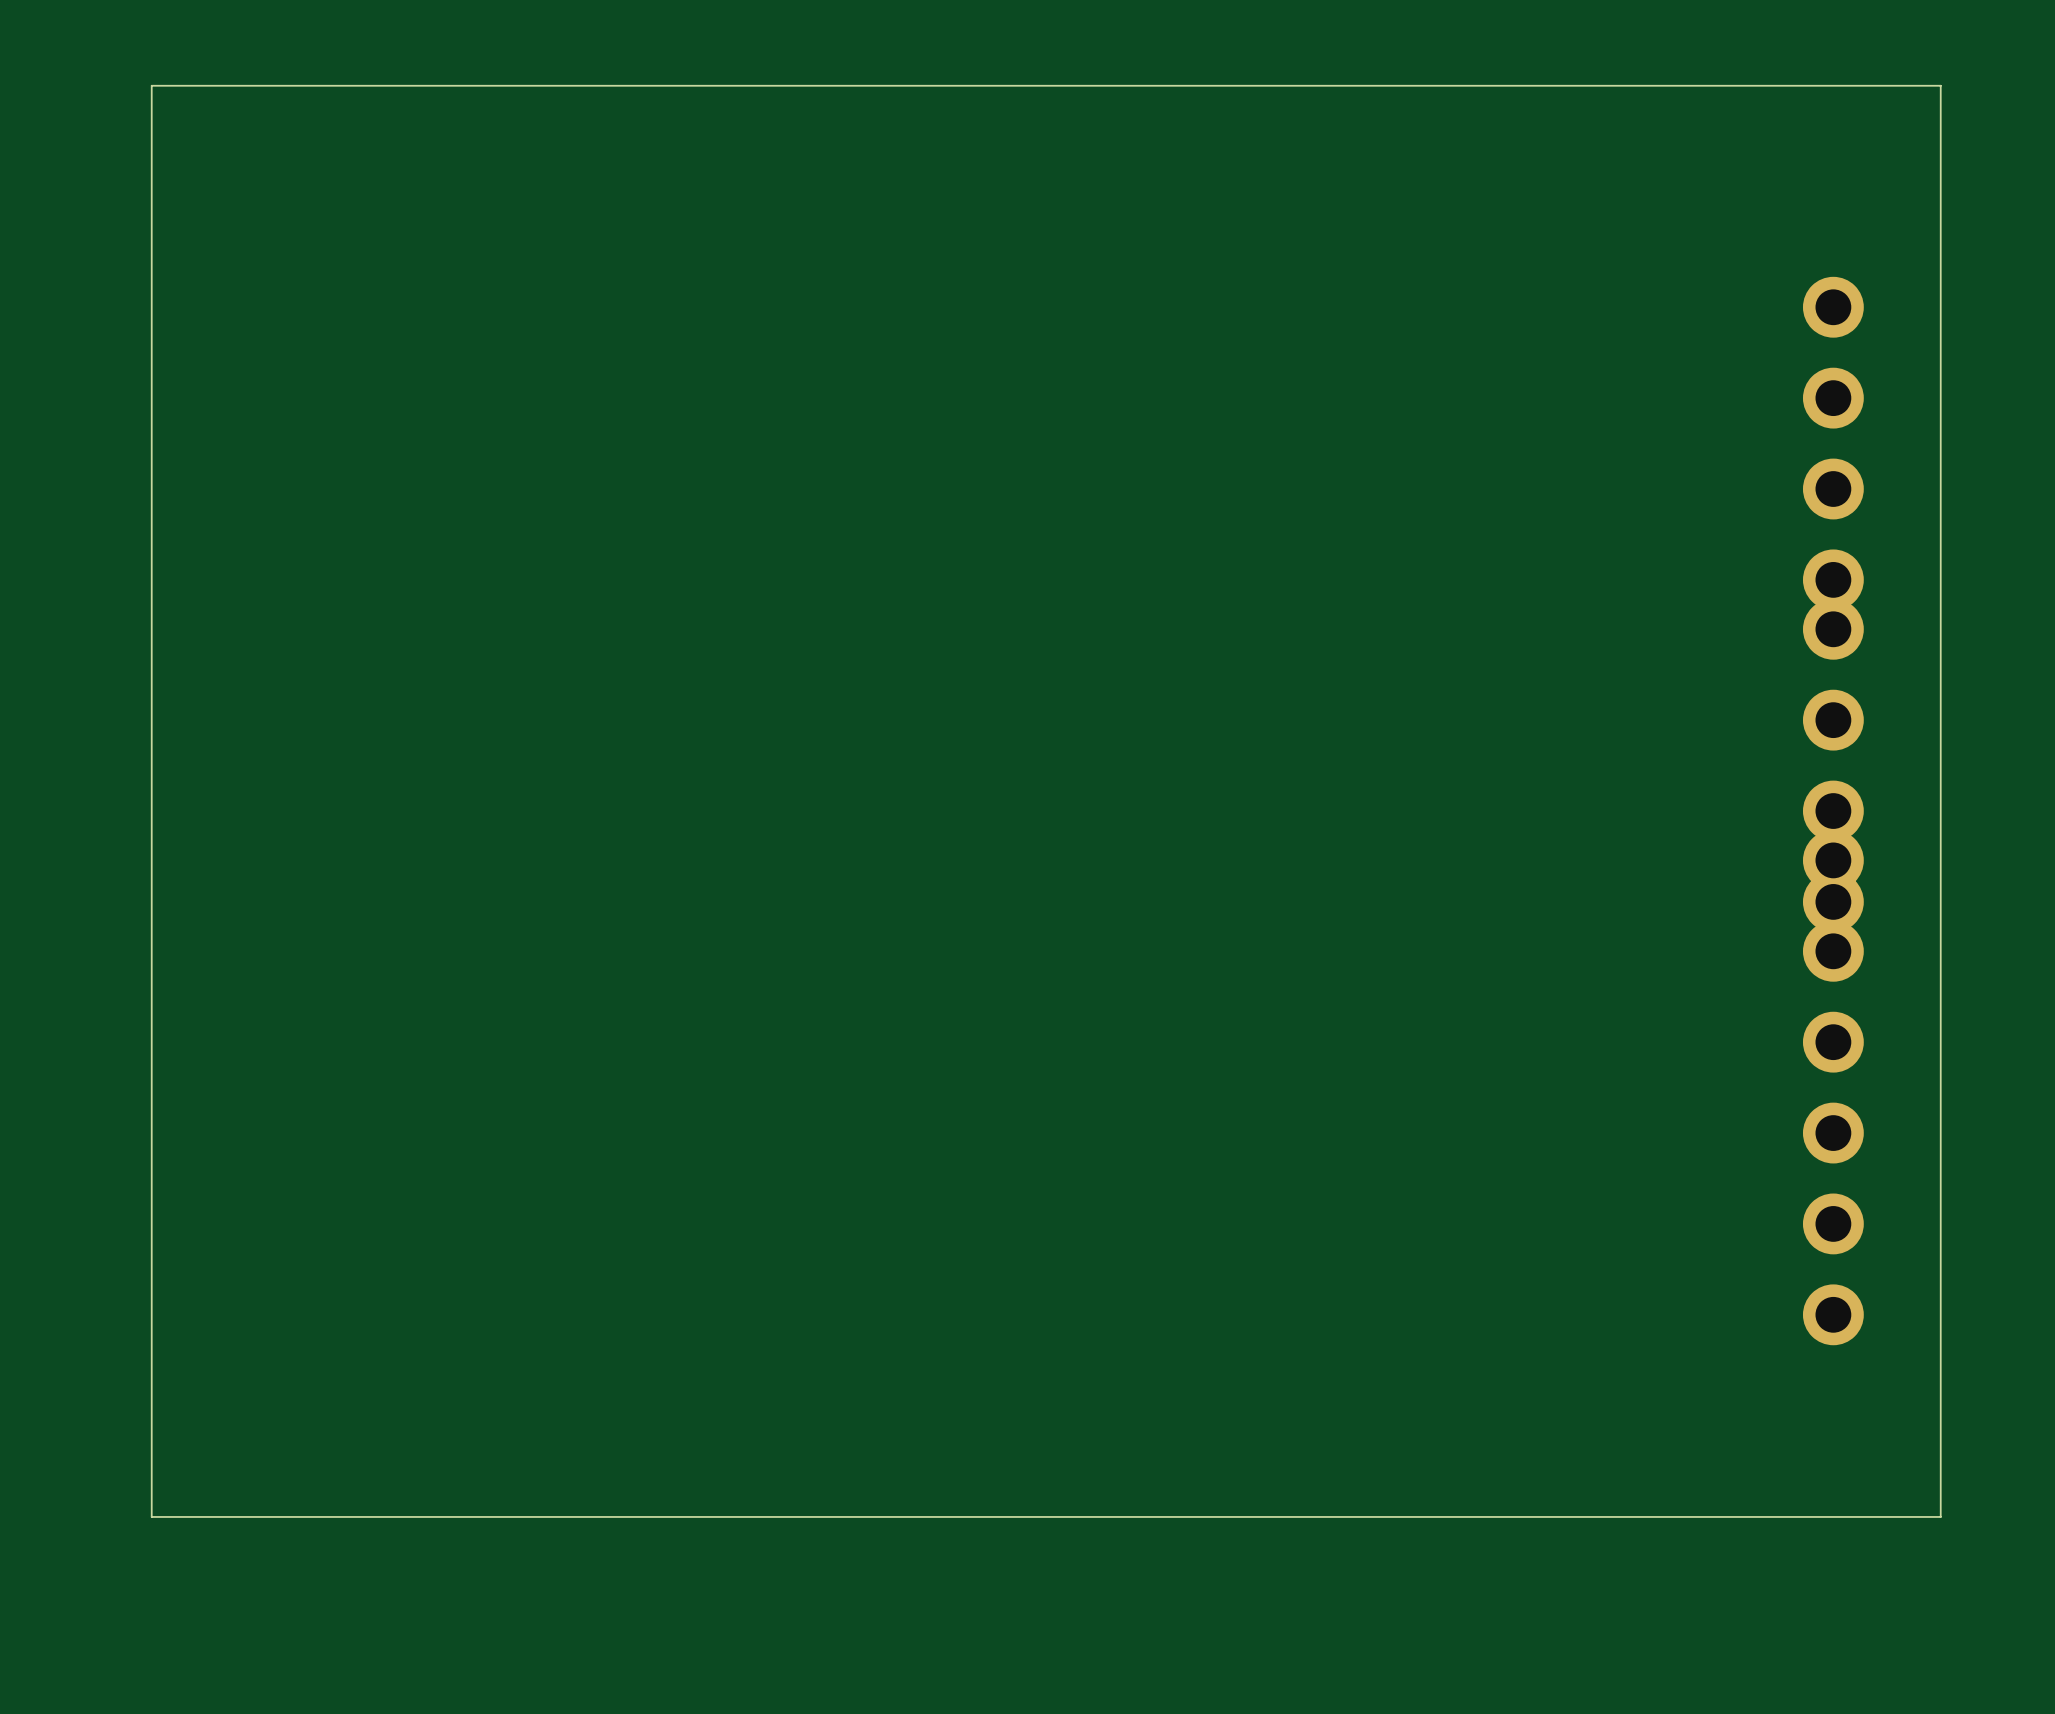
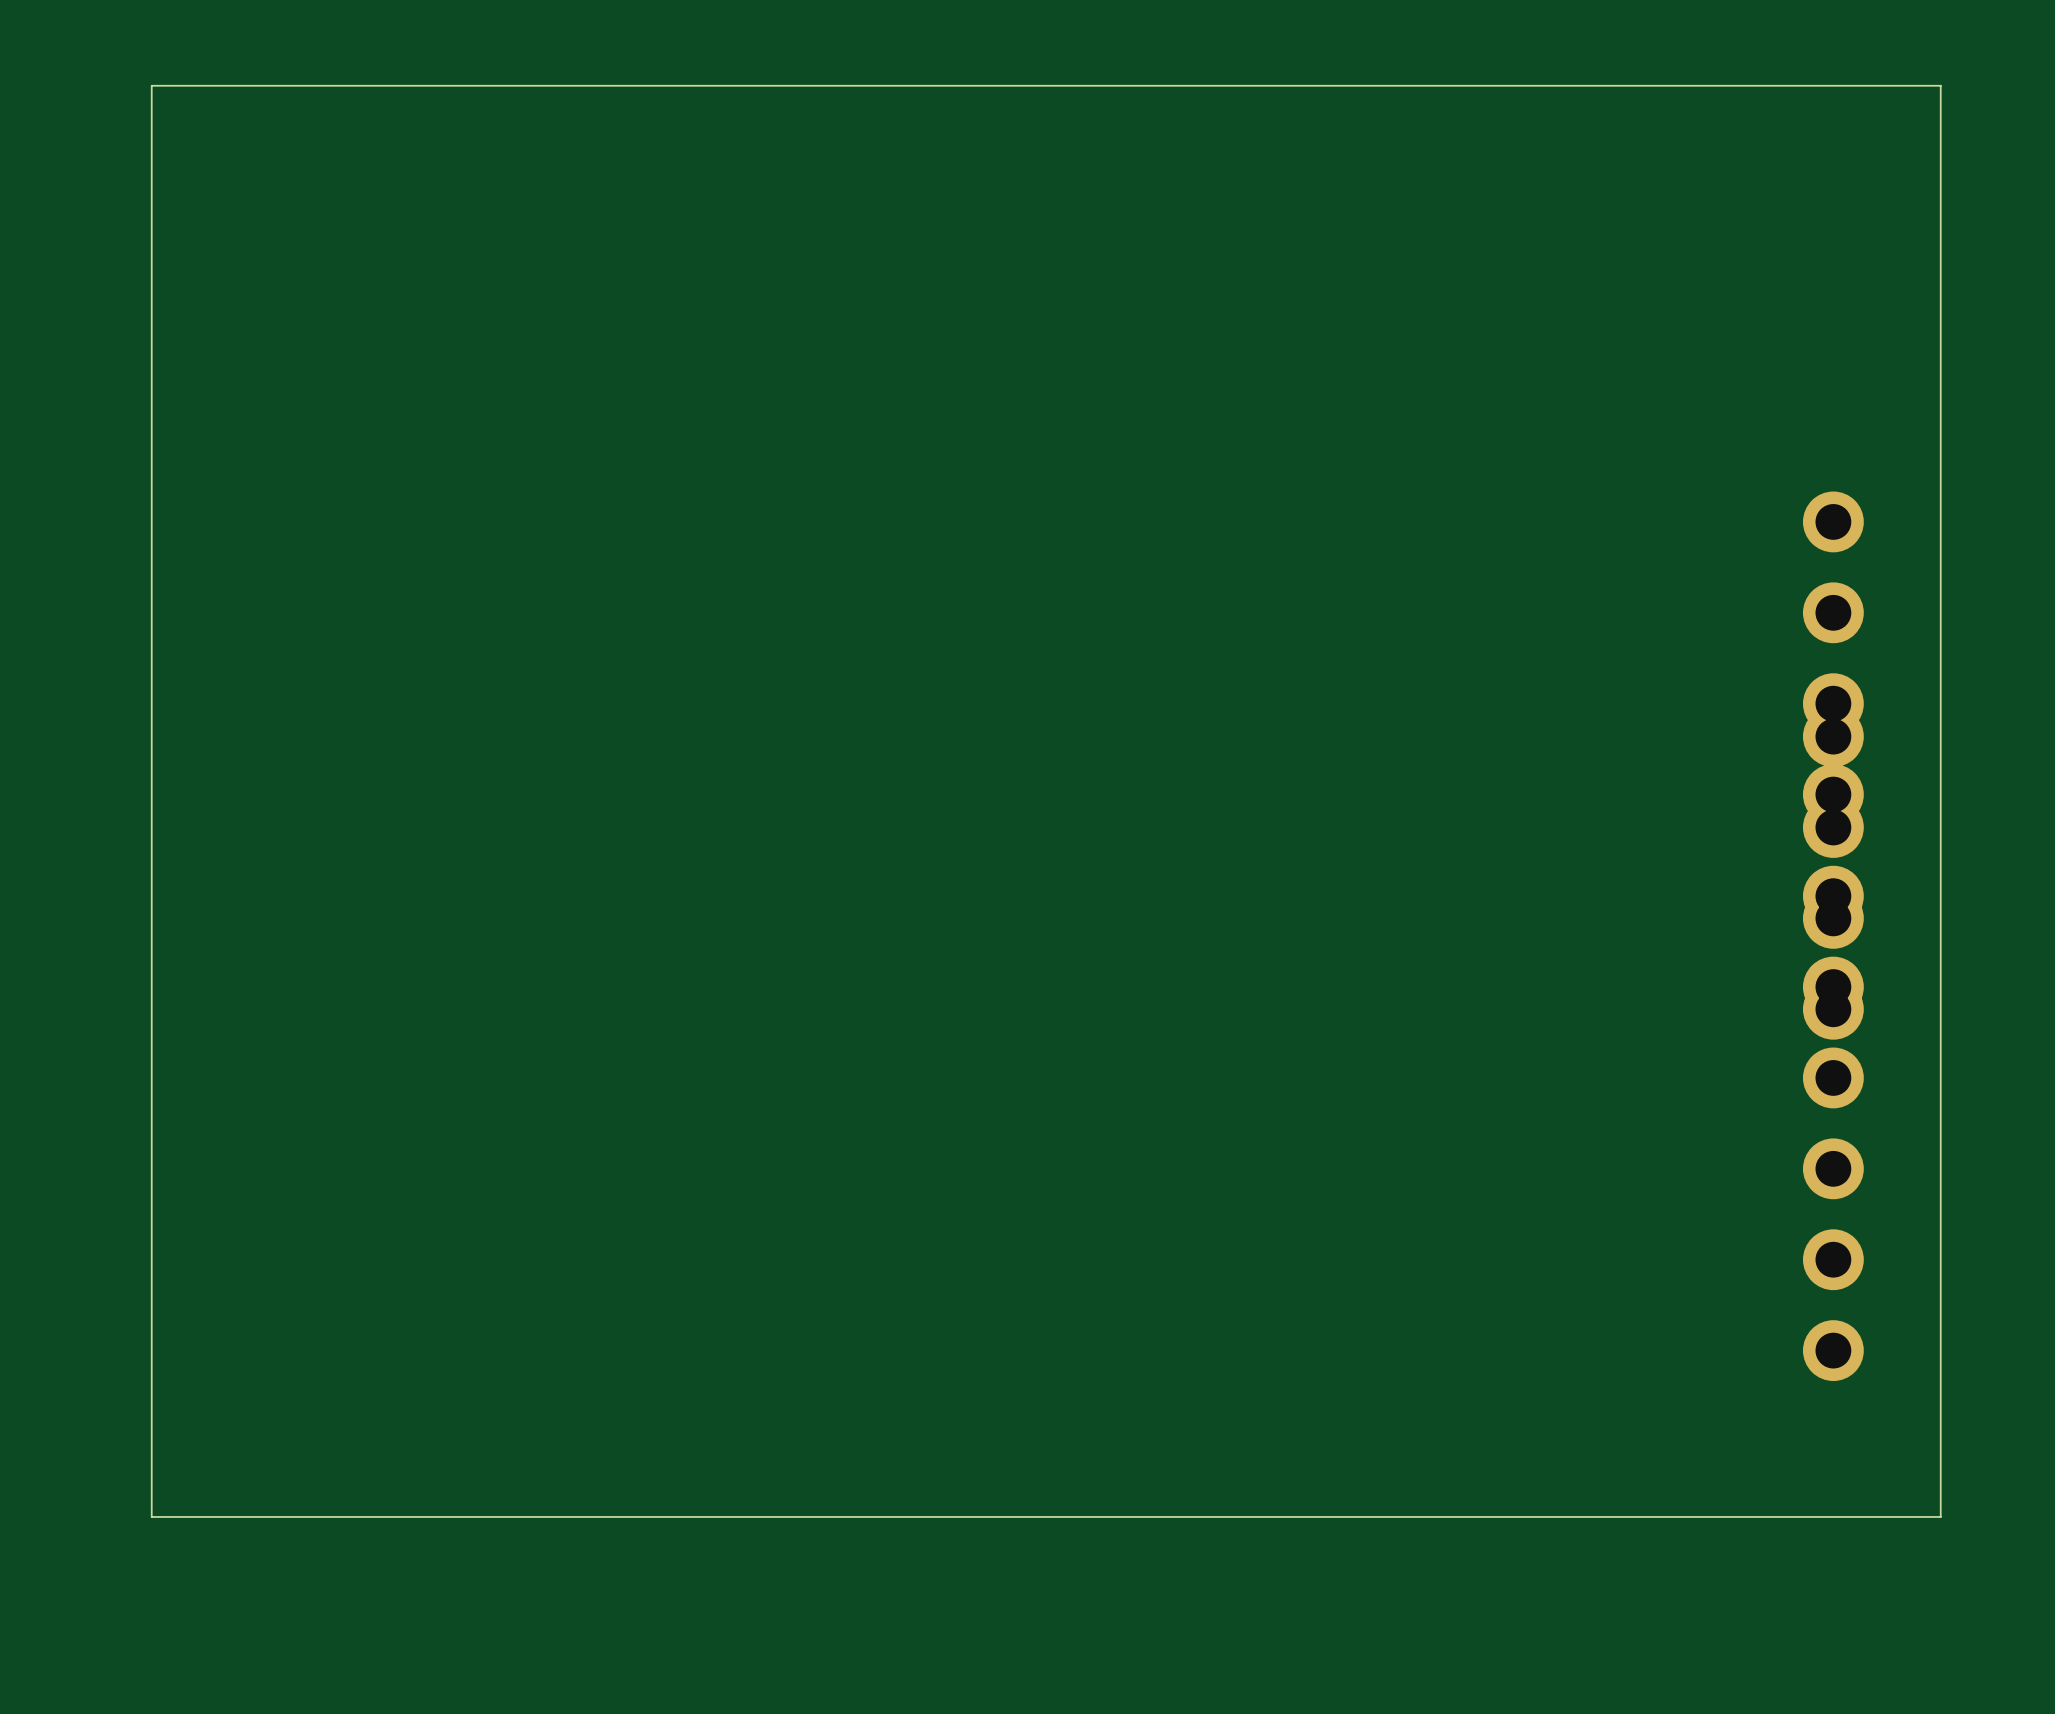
part: (1833, 443) -> none
part: none -> (1833, 658)
part: (1833, 765) -> none
part: none -> (1833, 872)
part position: (1833, 1087) -> (1833, 1123)

